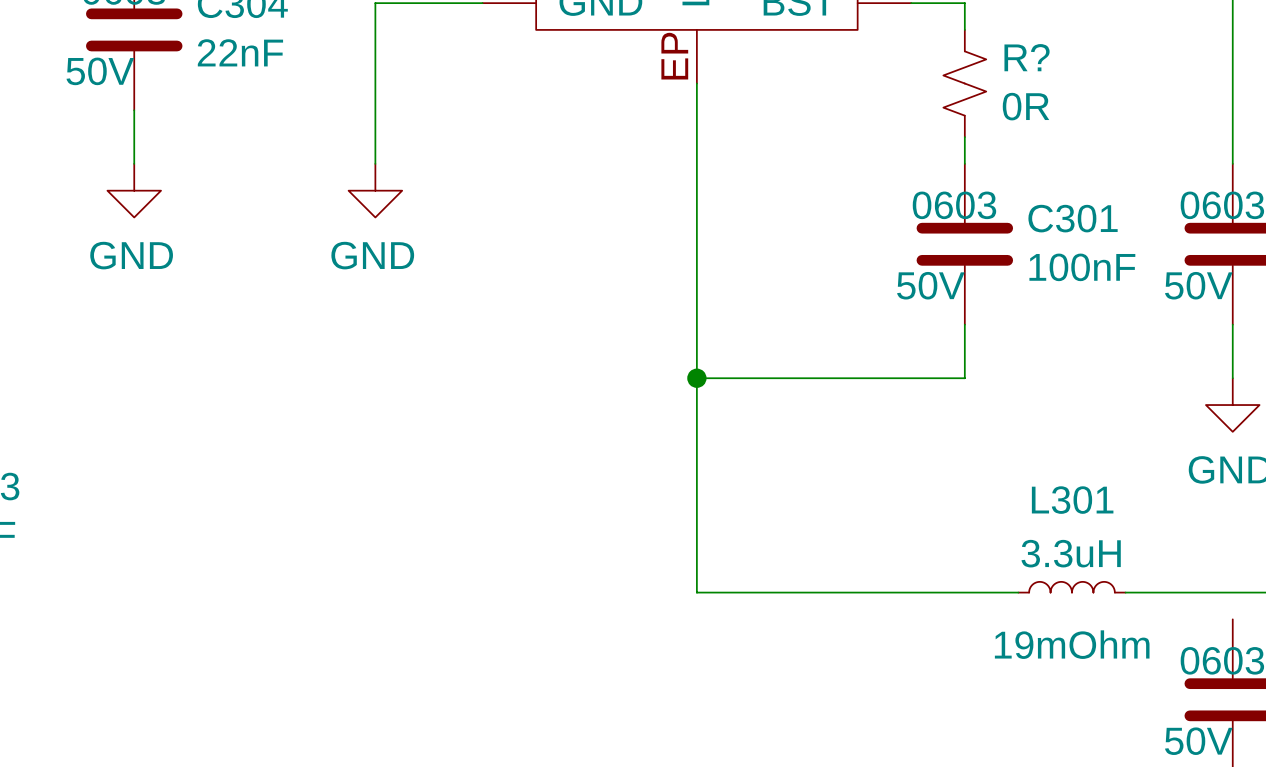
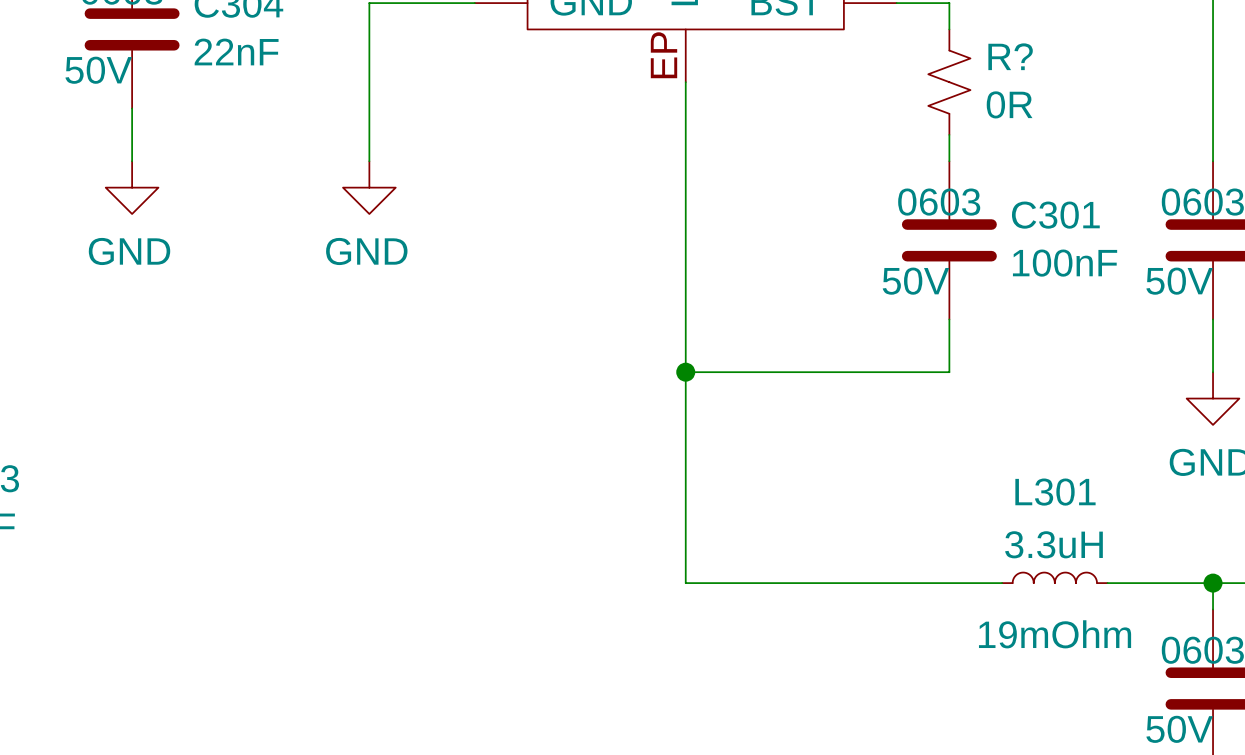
wire: none -> (1213, 583) (1213, 609)
junction: none -> (1213, 583)

